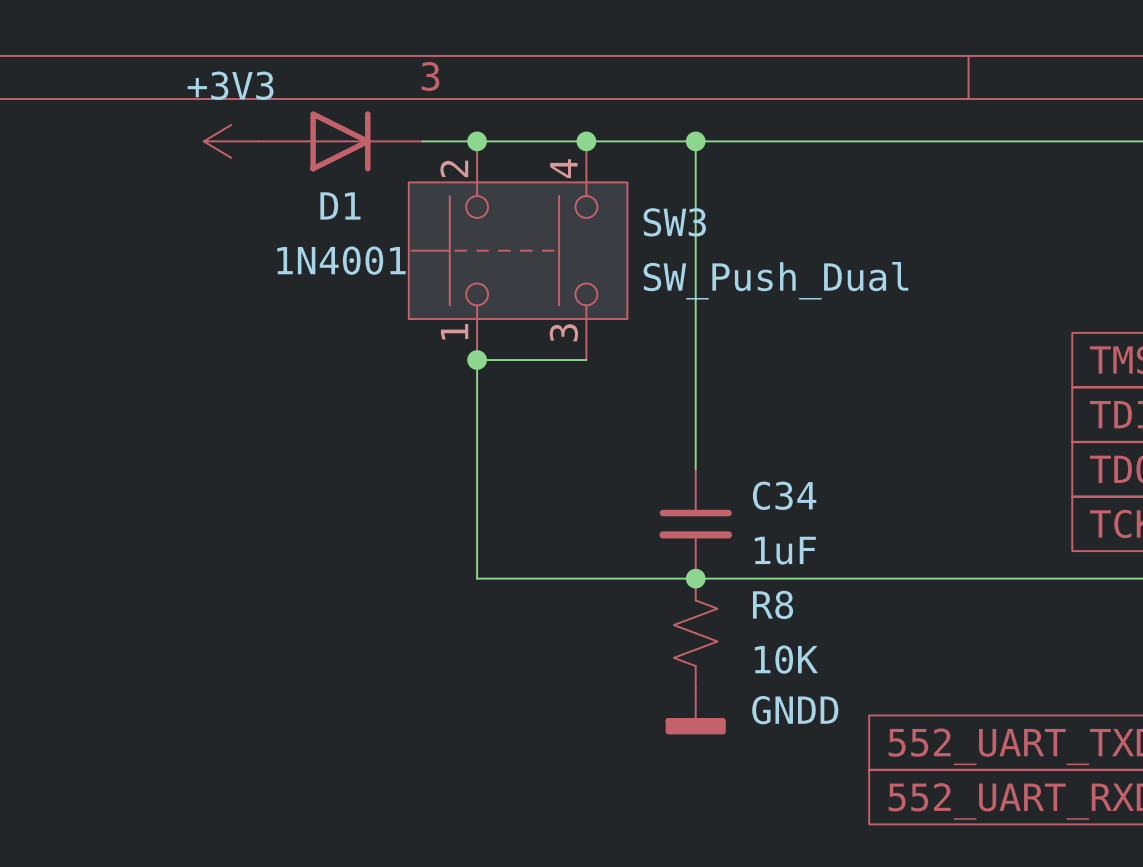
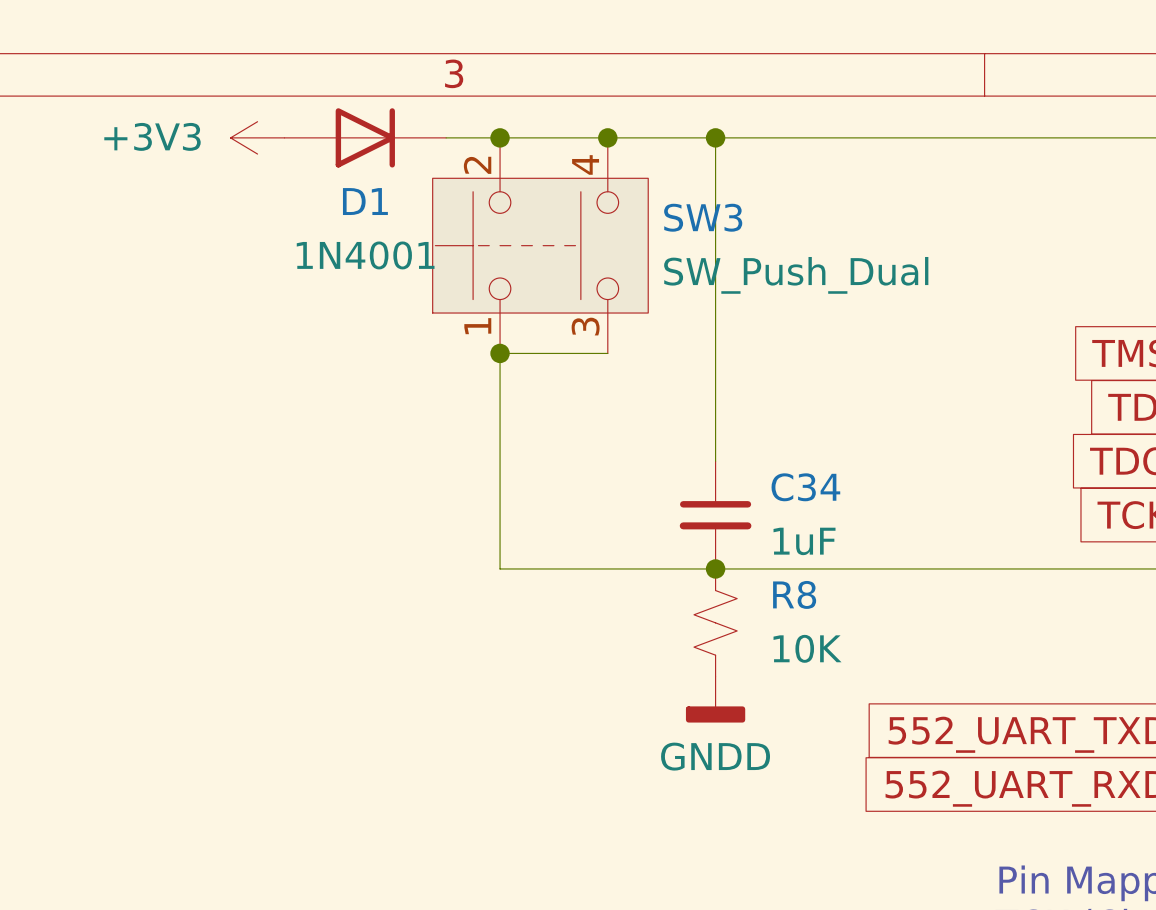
power symbol text position: +3V3 (230, 85) -> +3V3 (152, 136)
power symbol text position: GNDD (795, 710) -> GNDD (715, 756)

